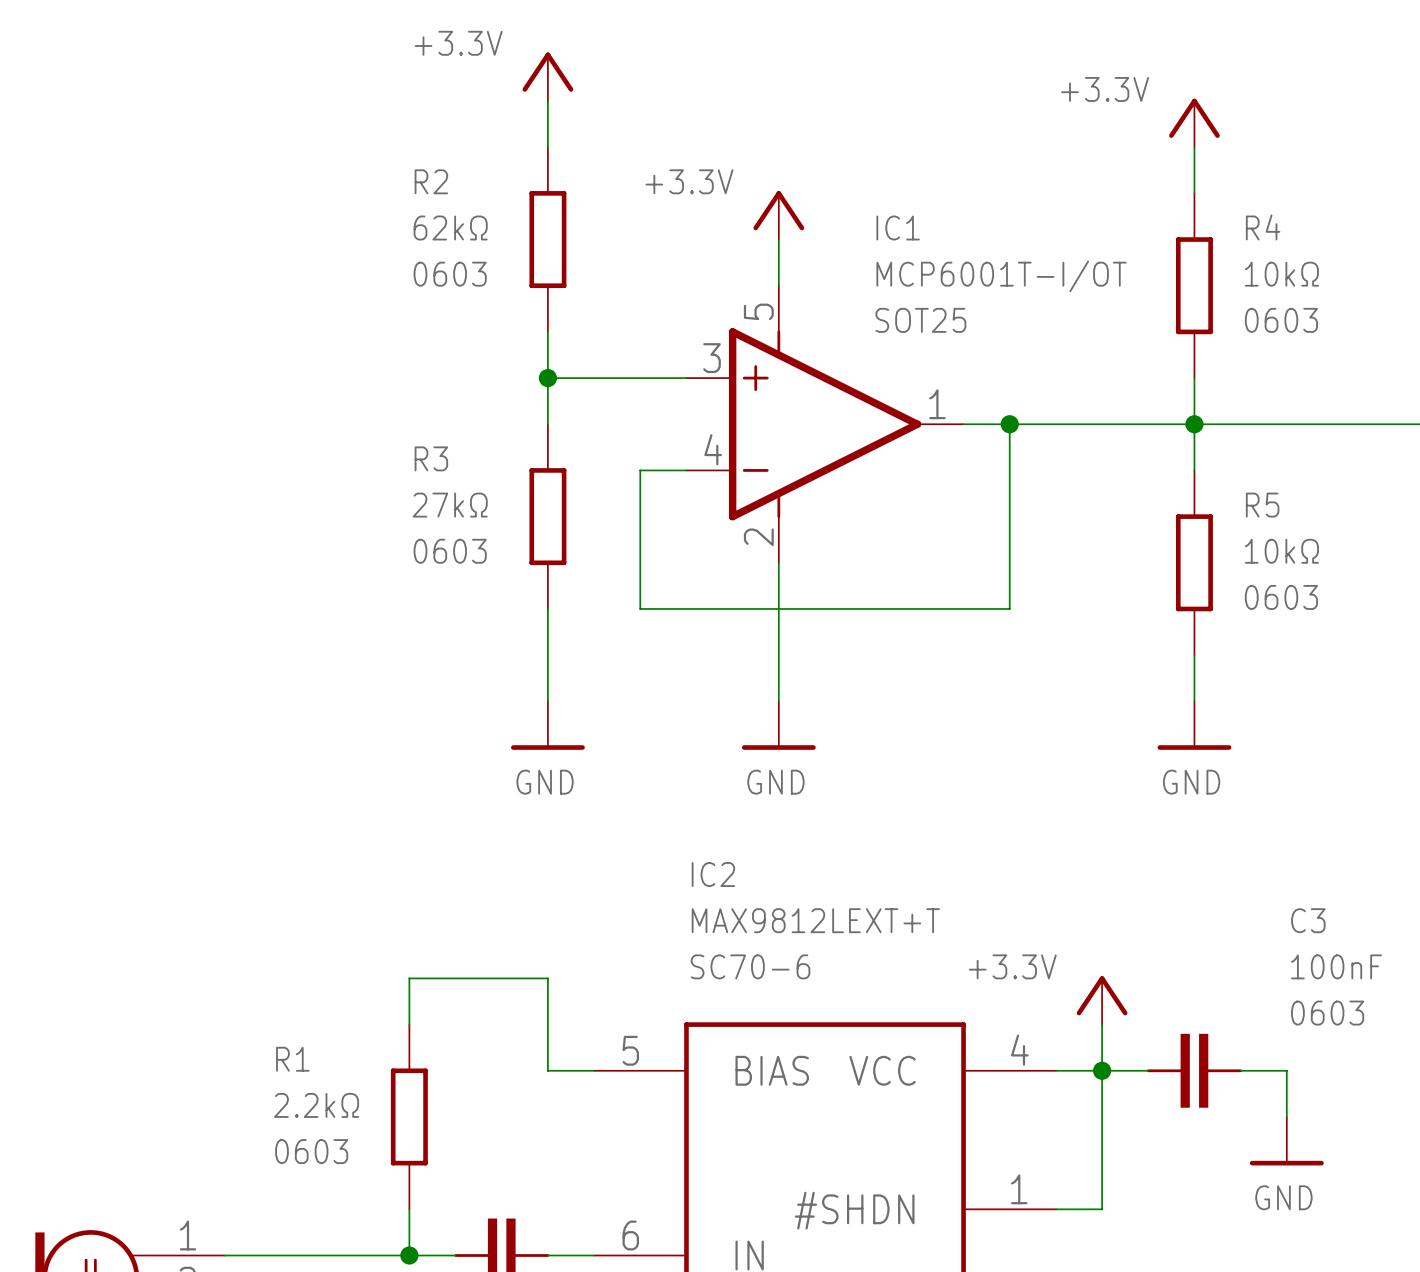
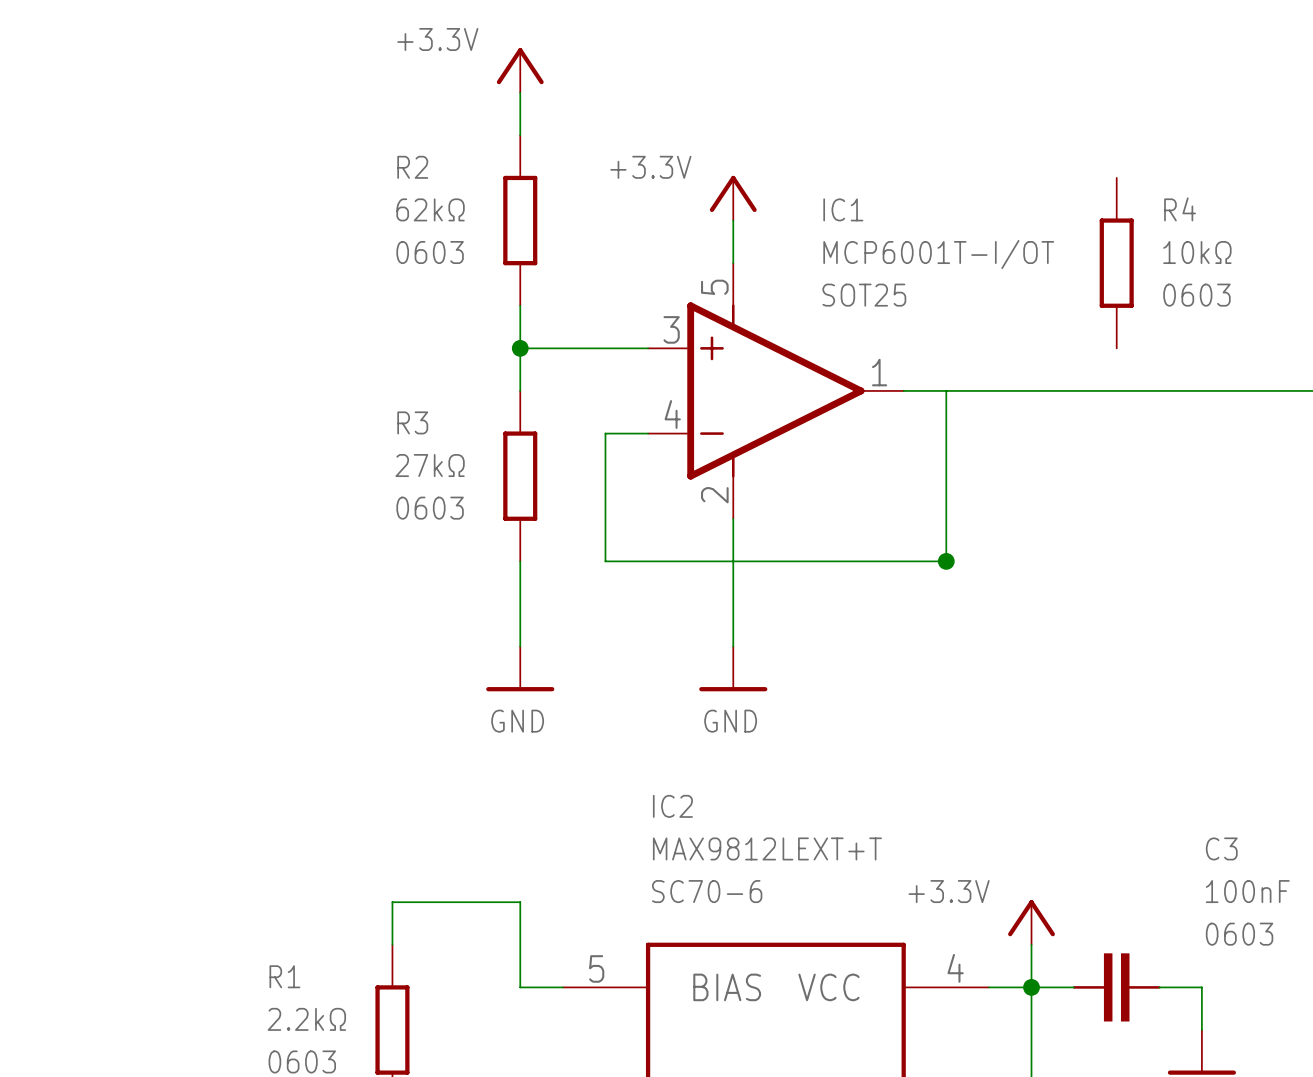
power symbol: +3.3V (1194, 122) -> none
wire: (1194, 147) (1194, 193) -> none
wire: (1194, 378) (1194, 470) -> none
junction: (1009, 424) -> none
junction: (1194, 424) -> none
R5: 10kΩ (1194, 562) -> none
junction: none -> (946, 561)
wire: (1194, 655) (1194, 701) -> none
power symbol: GND (1194, 725) -> none

